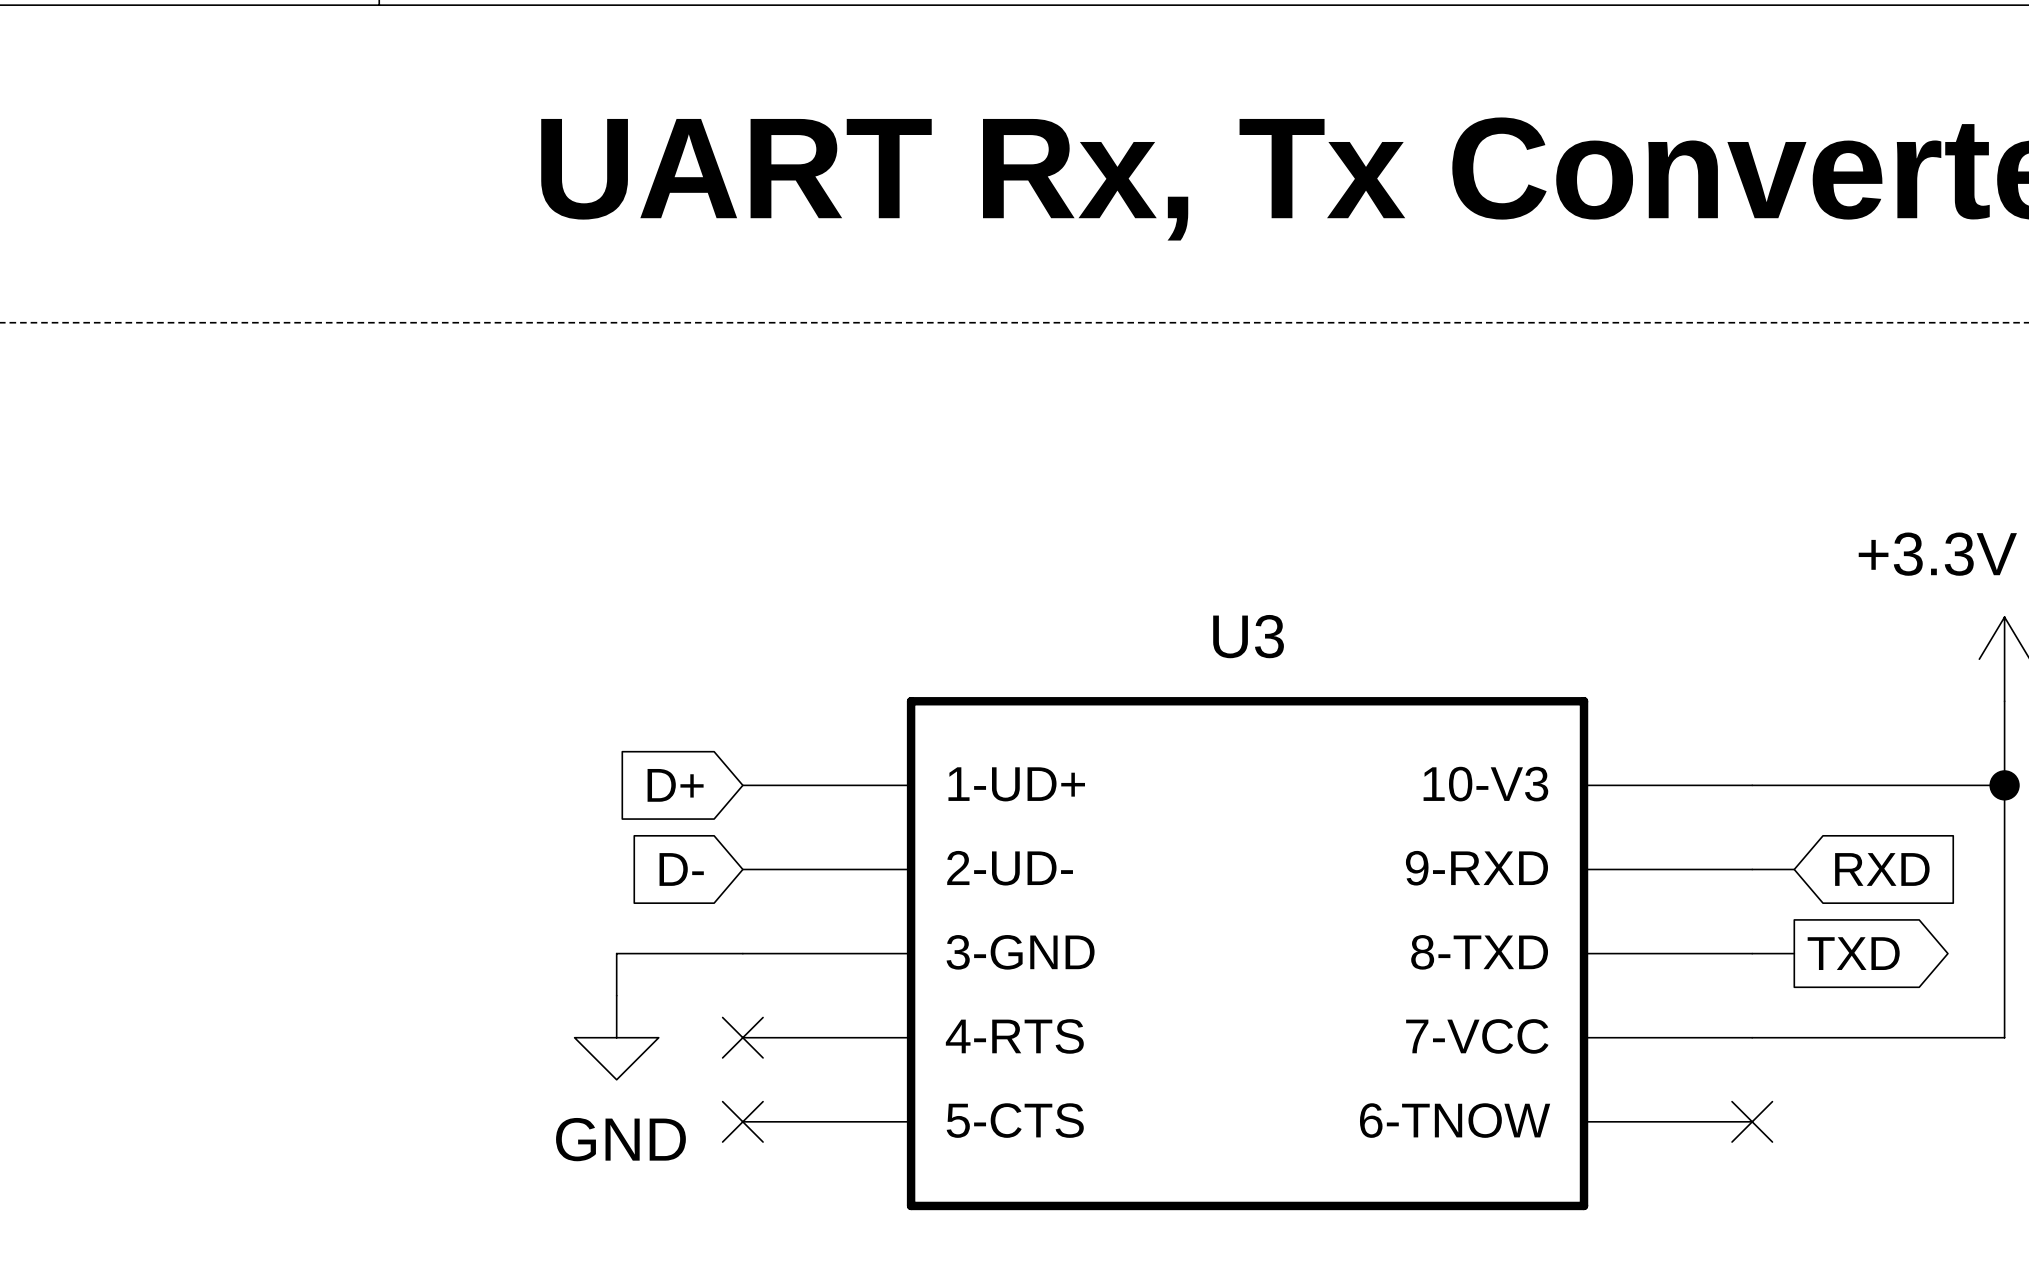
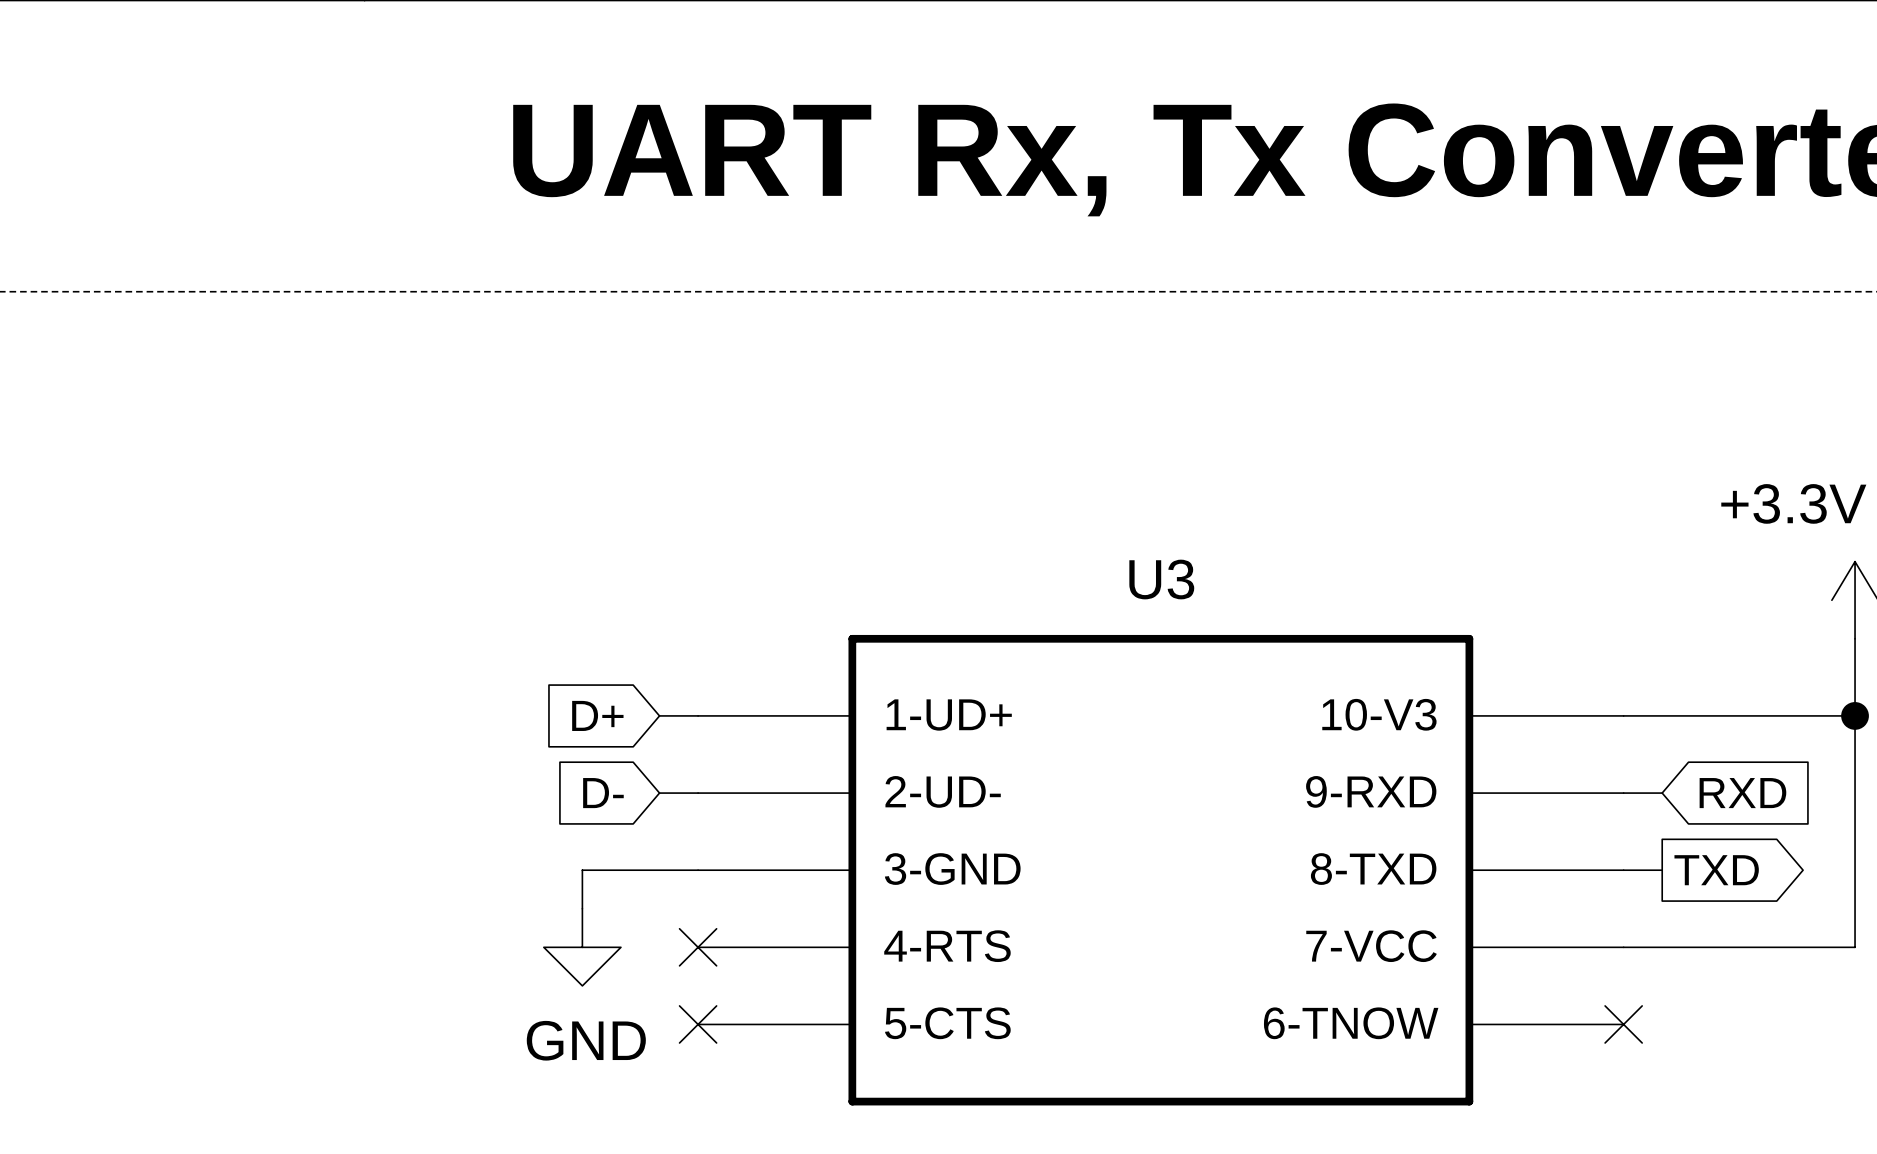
global label position: D+ (675, 785) -> D+ (597, 715)
wire: none -> (659, 715) (698, 715)
global label position: D- (681, 869) -> D- (603, 793)
wire: none -> (659, 793) (698, 793)

